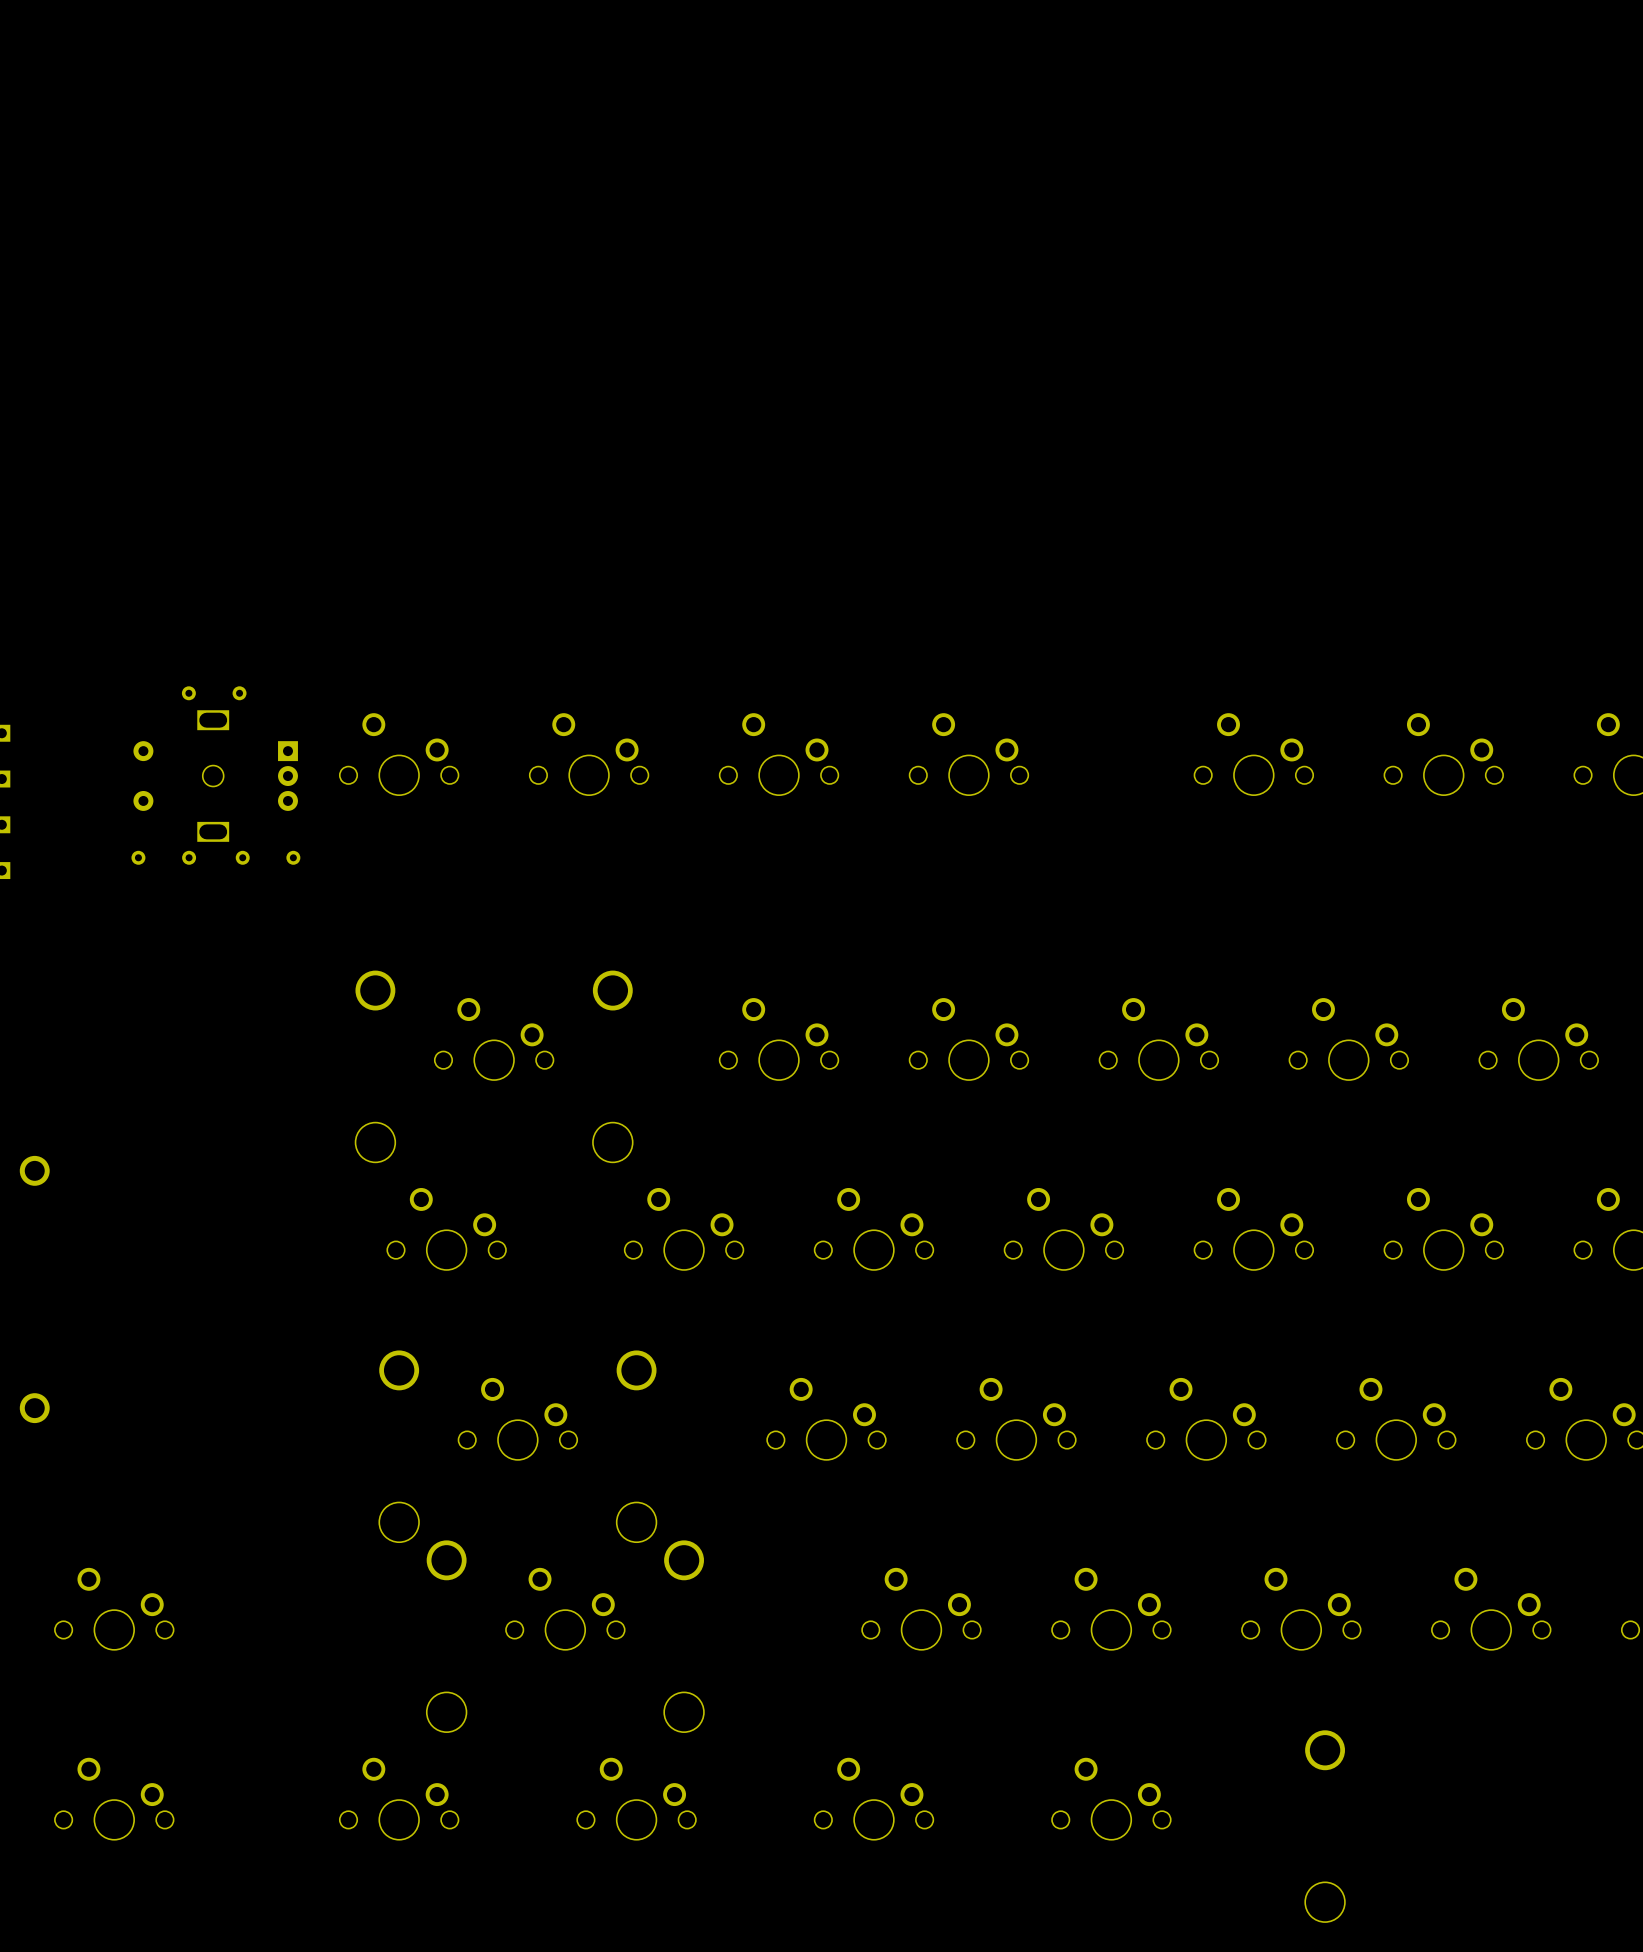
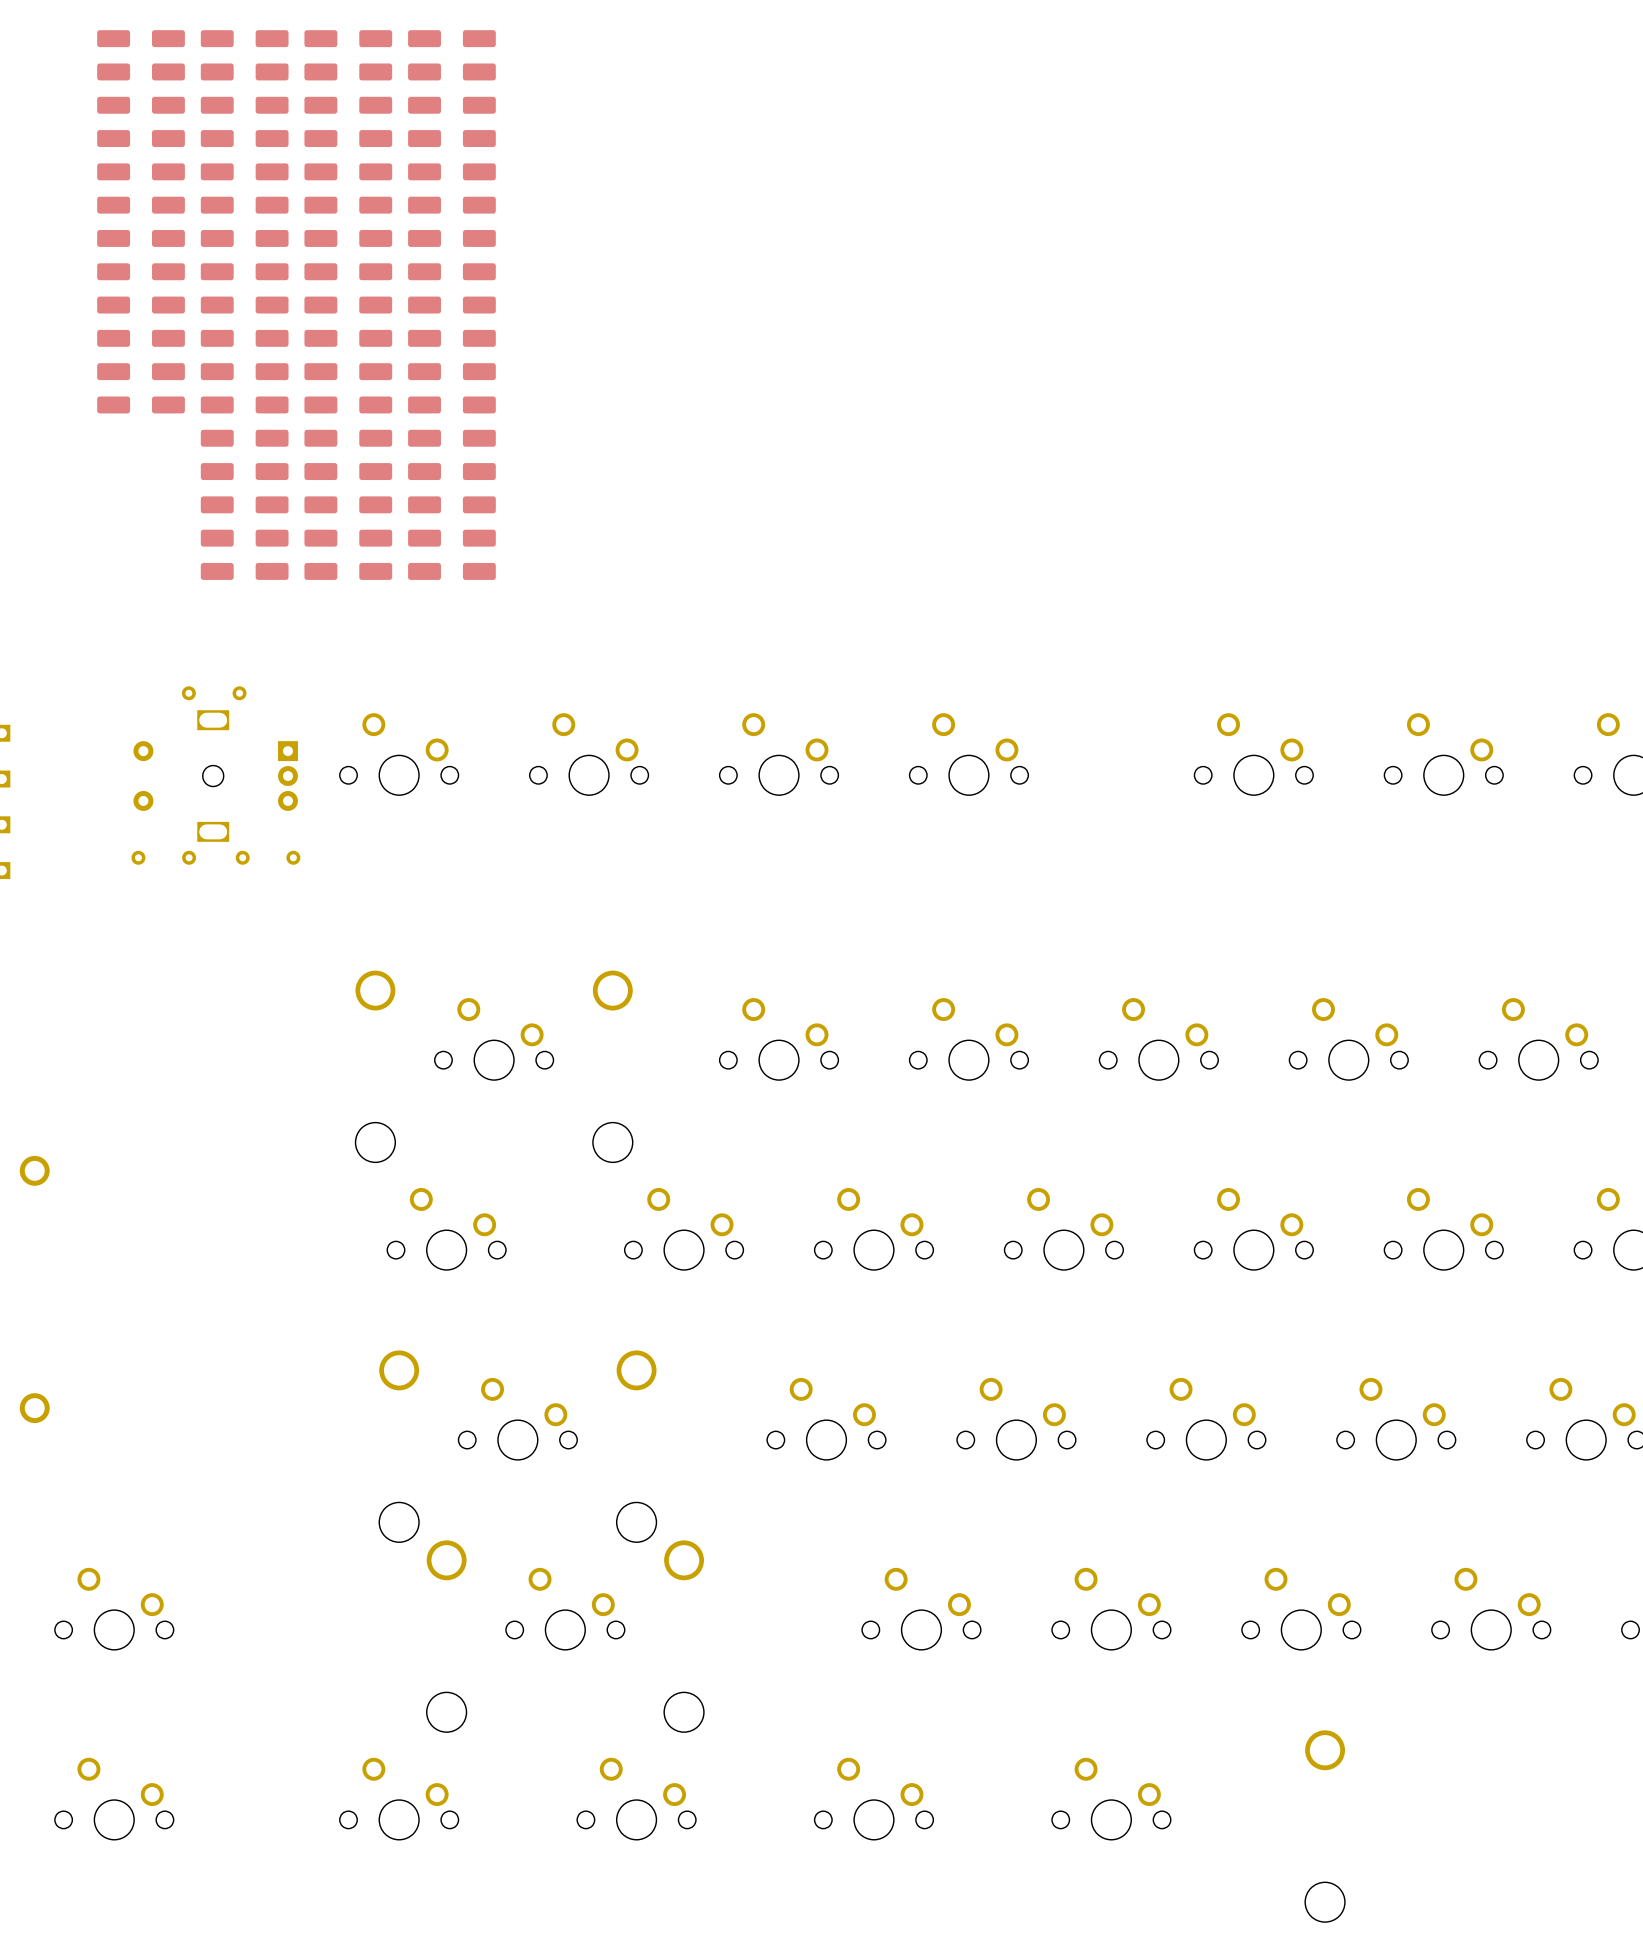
part: none -> (141, 38)
part: none -> (244, 38)
part: none -> (348, 38)
part: none -> (451, 38)
part: none -> (141, 71)
part: none -> (244, 71)
part: none -> (348, 71)
part: none -> (451, 71)
part: none -> (141, 105)
part: none -> (244, 105)
part: none -> (348, 105)
part: none -> (451, 105)
part: none -> (141, 138)
part: none -> (244, 138)
part: none -> (348, 138)
part: none -> (451, 138)
part: none -> (141, 171)
part: none -> (244, 171)
part: none -> (348, 171)
part: none -> (451, 171)
part: none -> (141, 205)
part: none -> (244, 205)
part: none -> (348, 205)
part: none -> (451, 205)
part: none -> (141, 238)
part: none -> (244, 238)
part: none -> (348, 238)
part: none -> (451, 238)
part: none -> (141, 271)
part: none -> (244, 271)
part: none -> (348, 271)
part: none -> (451, 271)
part: none -> (141, 305)
part: none -> (244, 305)
part: none -> (348, 305)
part: none -> (451, 305)
part: none -> (141, 338)
part: none -> (244, 338)
part: none -> (348, 338)
part: none -> (451, 338)
part: none -> (141, 371)
part: none -> (244, 371)
part: none -> (348, 371)
part: none -> (451, 371)
part: none -> (141, 404)
part: none -> (244, 404)
part: none -> (348, 404)
part: none -> (451, 404)
part: none -> (244, 438)
part: none -> (348, 438)
part: none -> (451, 438)
part: none -> (244, 471)
part: none -> (348, 471)
part: none -> (451, 471)
part: none -> (244, 504)
part: none -> (348, 504)
part: none -> (451, 504)
part: none -> (244, 538)
part: none -> (348, 538)
part: none -> (451, 538)
part: none -> (244, 571)
part: none -> (348, 571)
part: none -> (451, 571)

